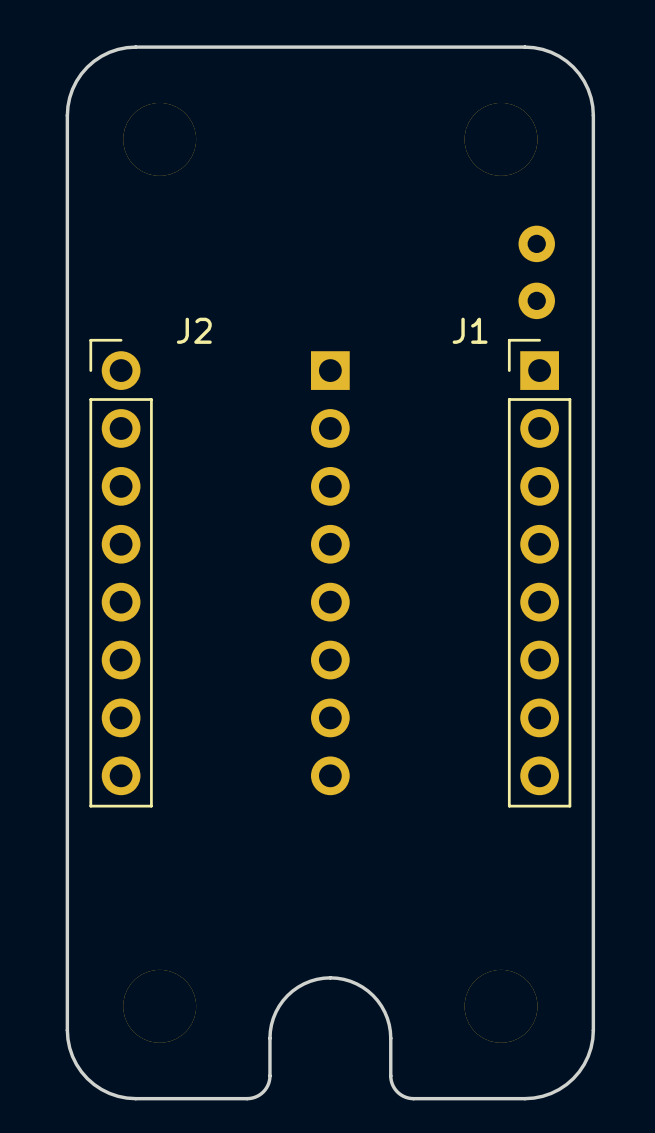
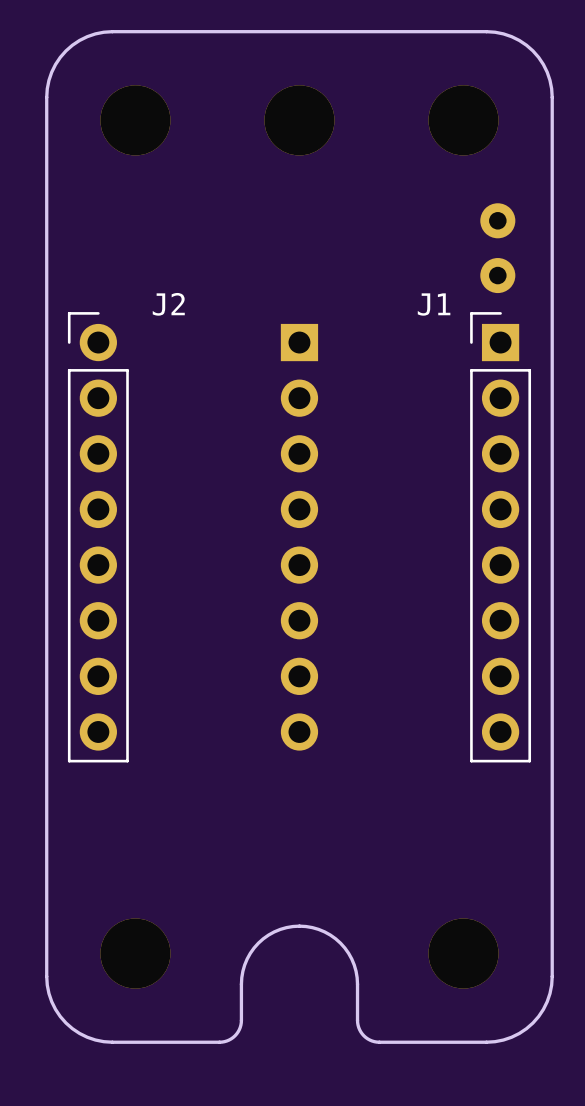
part: none -> (299, 120)

